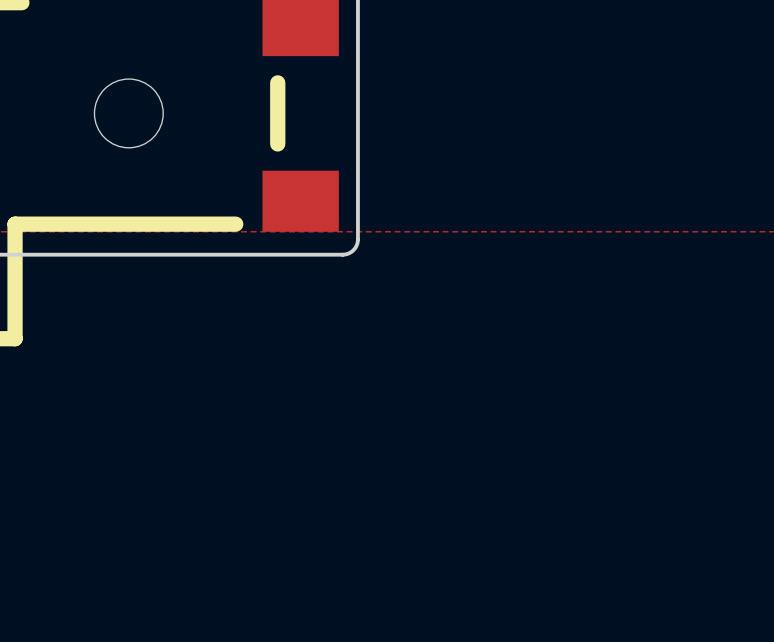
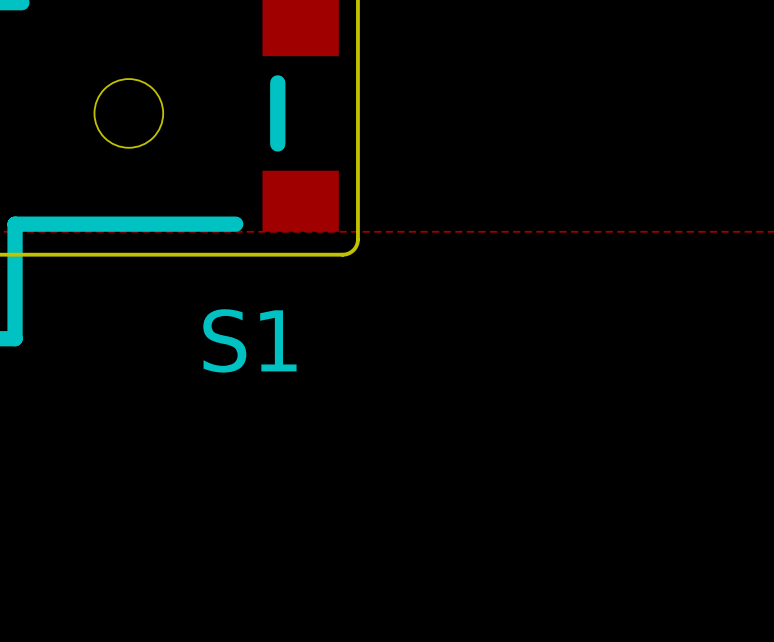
S1 name: none -> S1 (249, 340)

